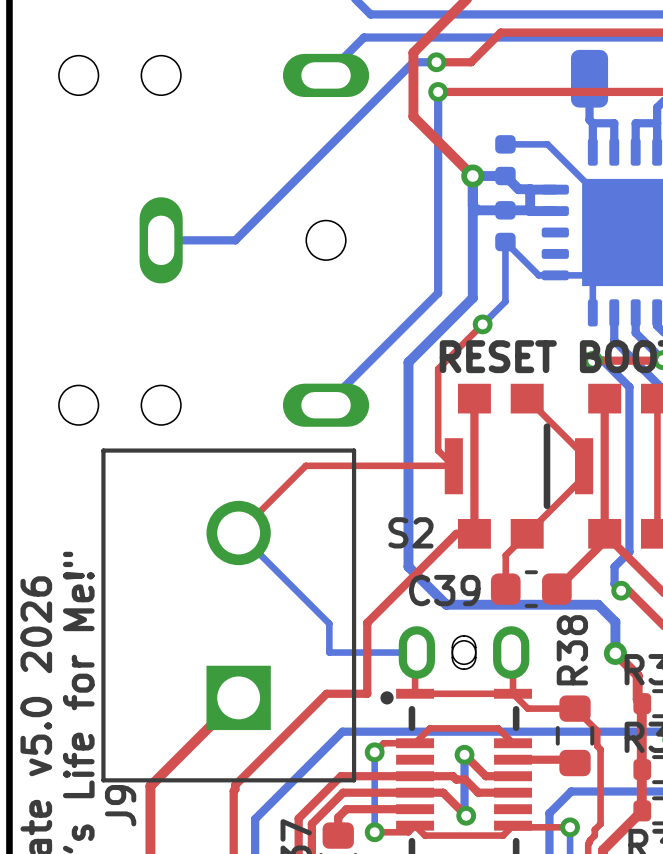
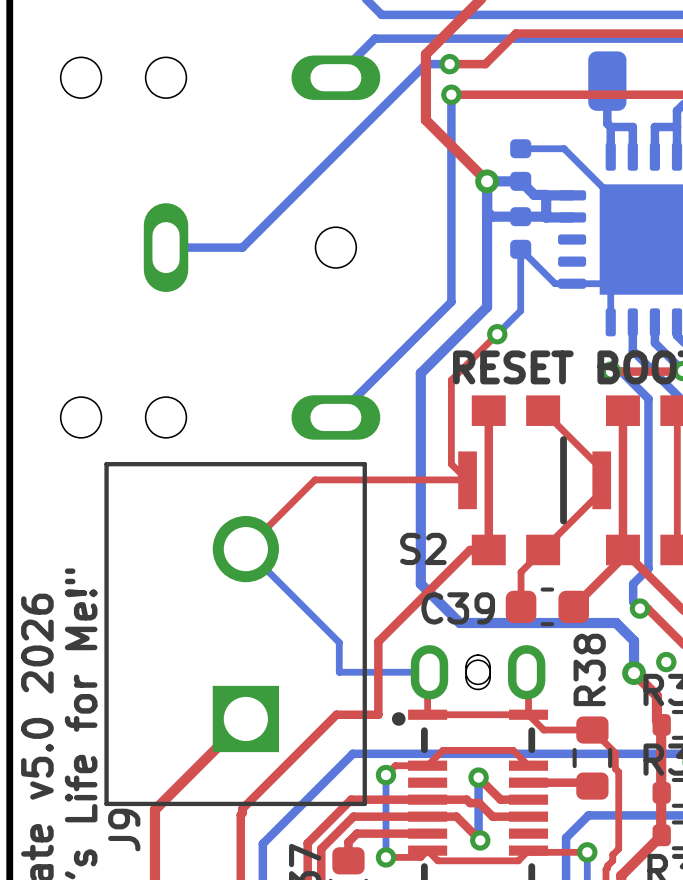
via: none -> (666, 662)

